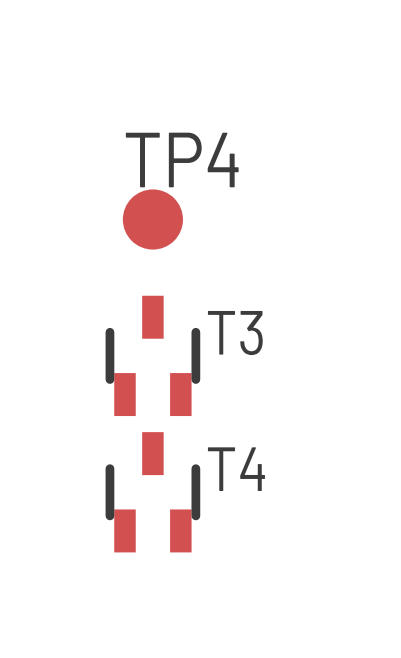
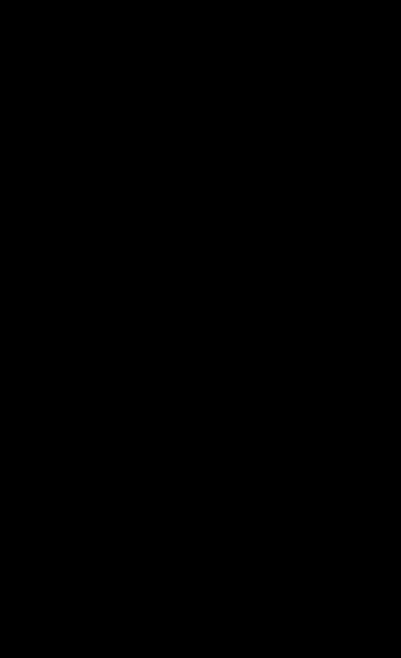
TP4: (152, 219) -> none
T3: (152, 355) -> none
T4: (152, 492) -> none

